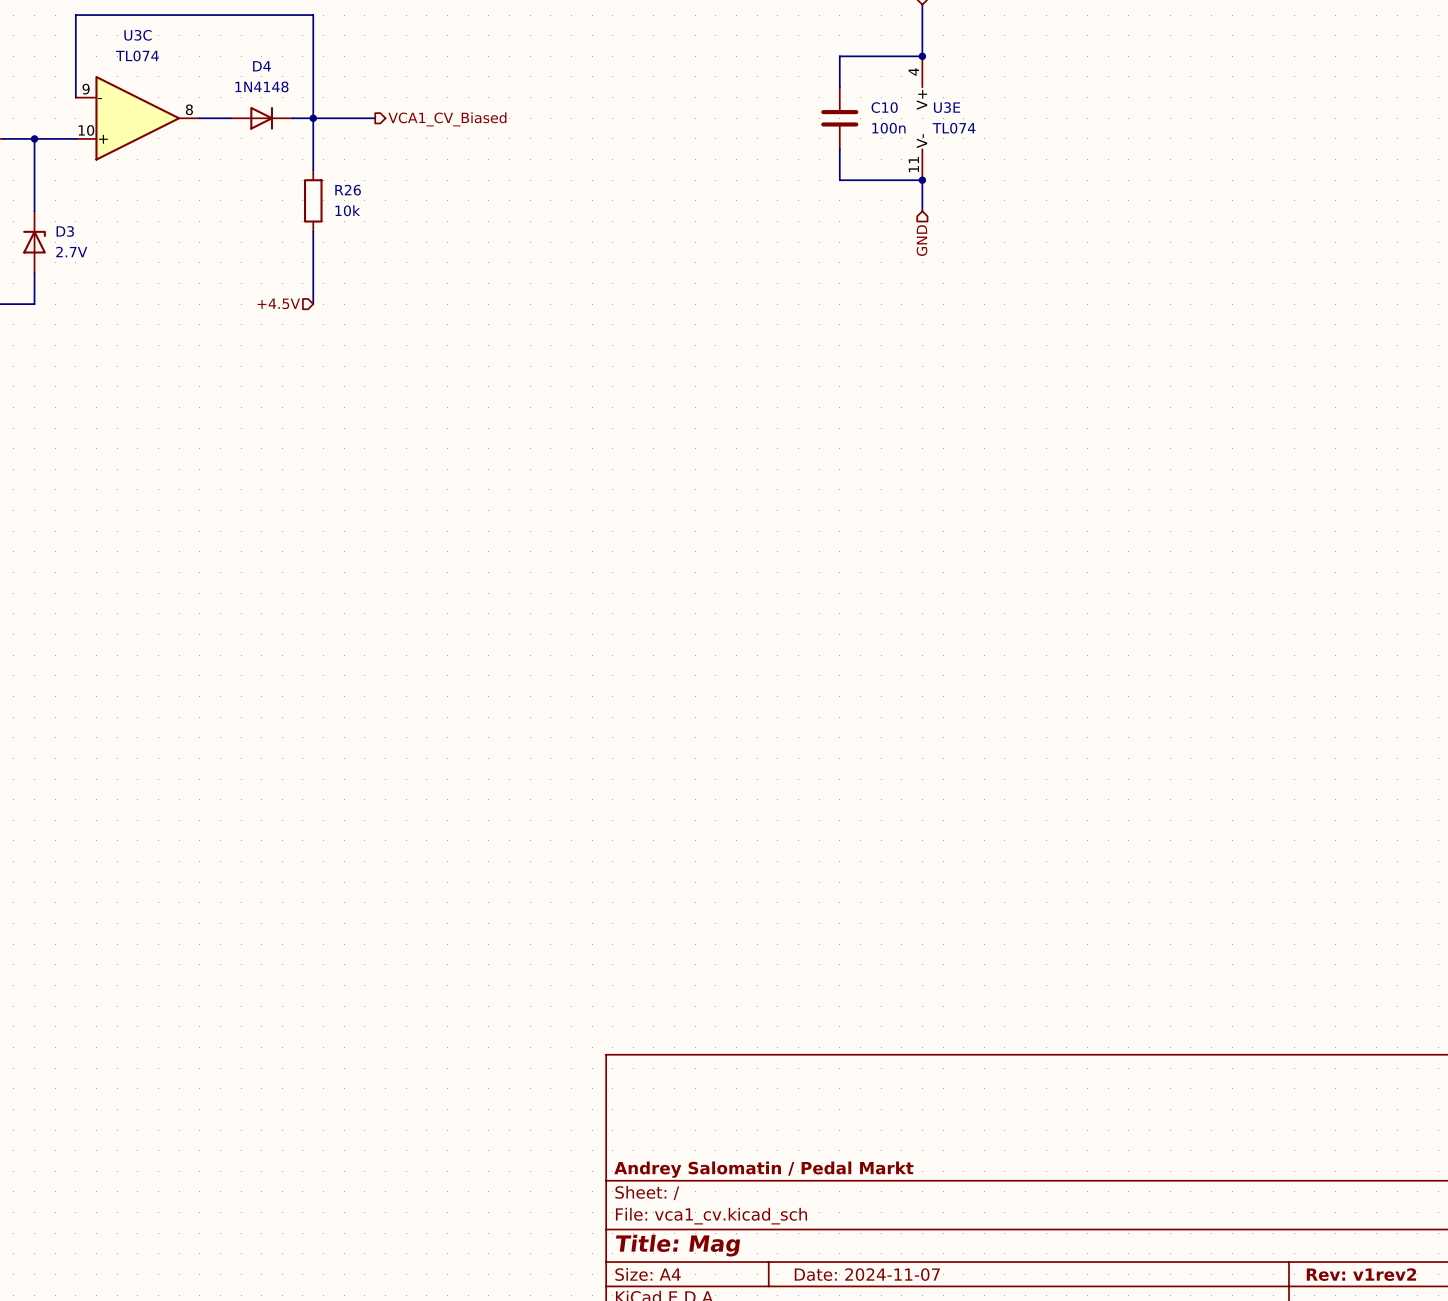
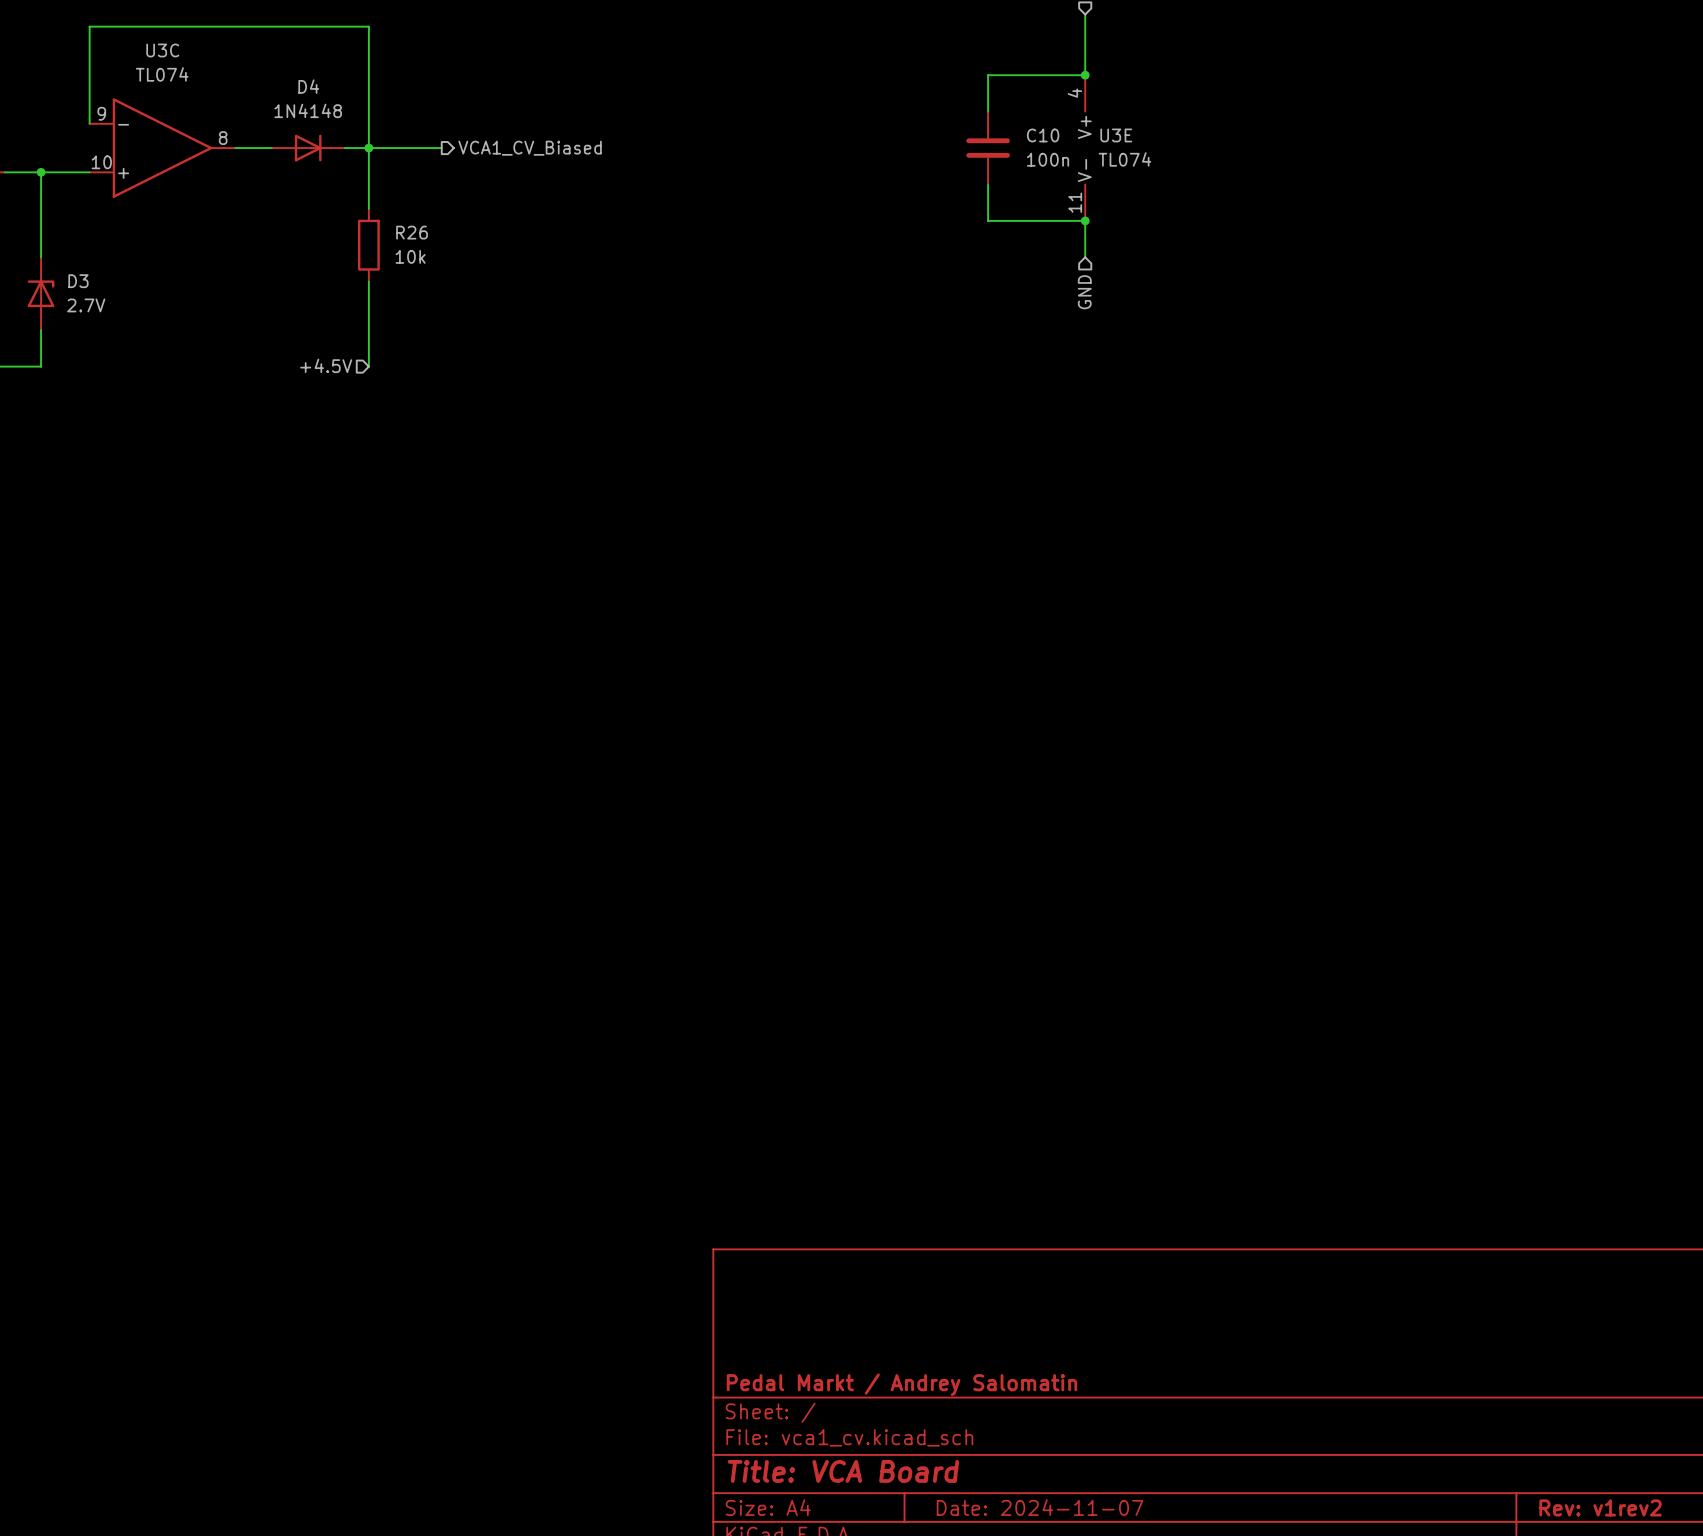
title block: Andrey Salomatin / Pedal Markt (763, 1169) -> Pedal Markt / Andrey Salomatin (901, 1384)
title block: Title: Mag (678, 1245) -> Title: VCA Board (843, 1471)

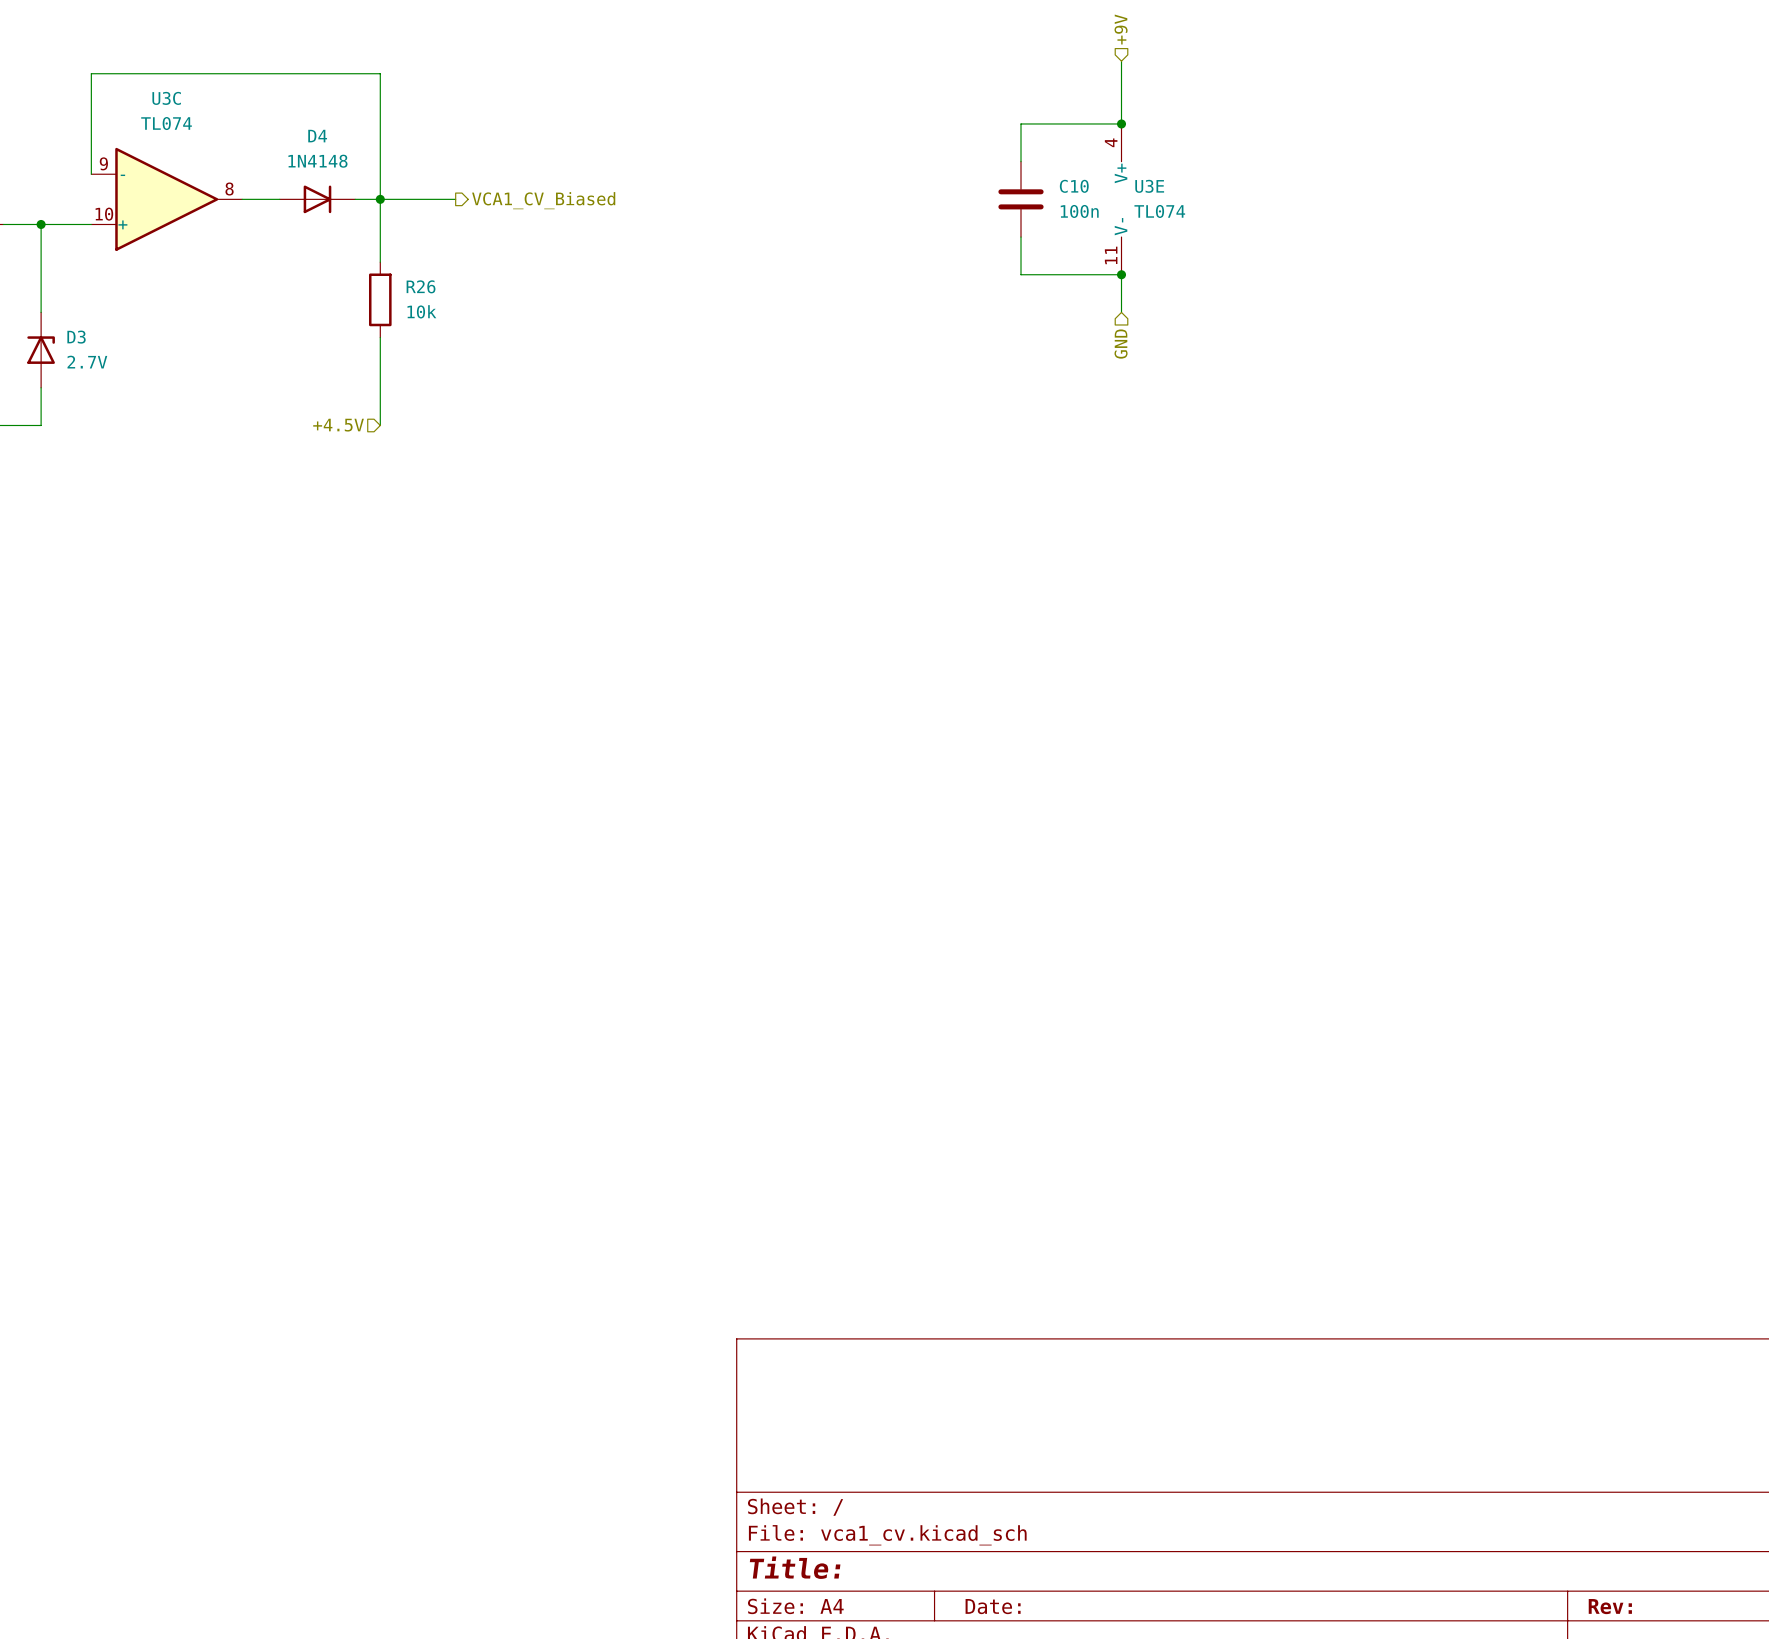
title block: Pedal Markt / Andrey Salomatin (901, 1384) -> none
title block: Title: VCA Board (843, 1471) -> Title: (795, 1567)
title block: Date: 2024-11-07 (1040, 1507) -> Date: (993, 1606)
title block: Rev: v1rev2 (1600, 1507) -> Rev: (1610, 1606)

